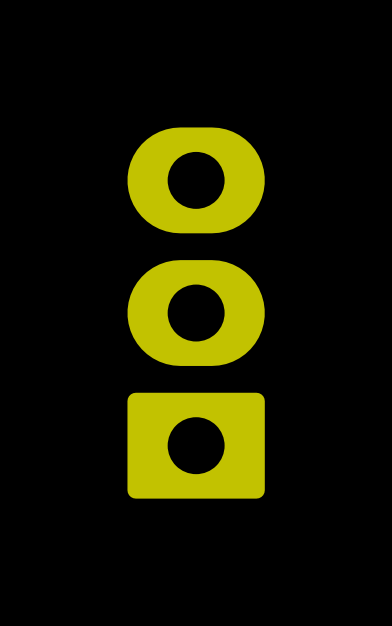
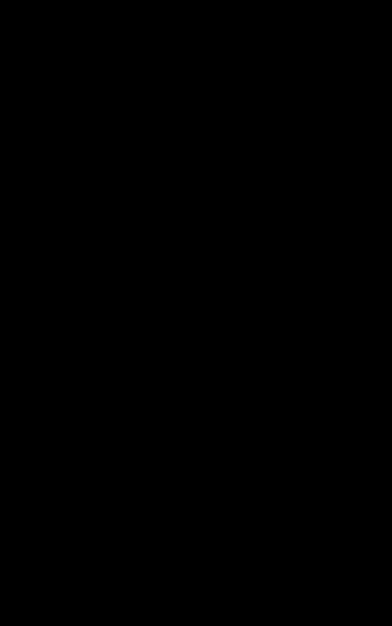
part: (196, 313) -> none

